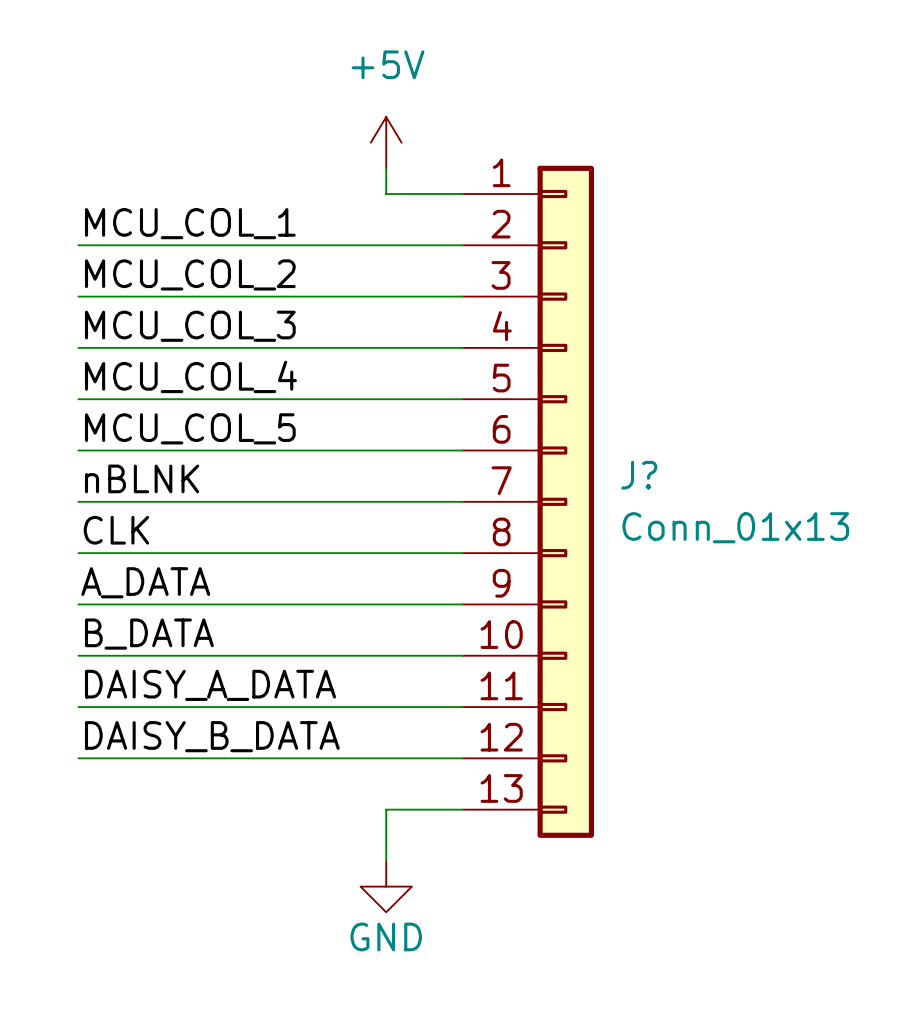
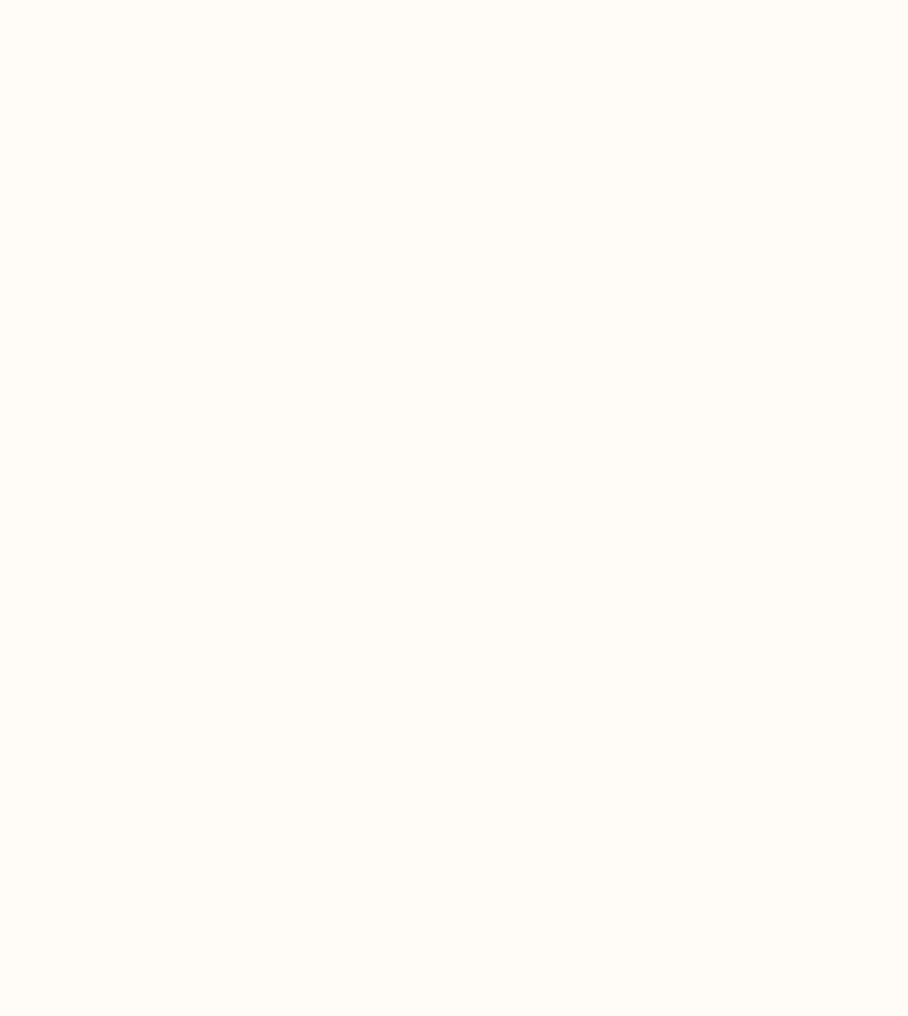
power symbol: +5V (386, 142) -> none
wire: (386, 168) (386, 193) (463, 193) -> none
label: MCU_COL_1 (190, 223) -> none
wire: (78, 245) (463, 245) -> none
label: MCU_COL_2 (190, 274) -> none
wire: (78, 296) (463, 296) -> none
label: MCU_COL_3 (190, 326) -> none
wire: (78, 347) (463, 347) -> none
label: MCU_COL_4 (190, 376) -> none
wire: (78, 399) (463, 399) -> none
label: MCU_COL_5 (190, 428) -> none
wire: (78, 450) (463, 450) -> none
label: nBLNK (142, 478) -> none
wire: (78, 501) (463, 501) -> none
J?: Conn_01x13 (528, 501) -> none
label: CLK (116, 530) -> none
wire: (78, 553) (463, 553) -> none
label: A_DATA (145, 582) -> none
wire: (78, 604) (463, 604) -> none
label: B_DATA (149, 634) -> none
wire: (78, 655) (463, 655) -> none
label: DAISY_A_DATA (210, 685) -> none
wire: (78, 707) (463, 707) -> none
label: DAISY_B_DATA (212, 736) -> none
wire: (78, 758) (463, 758) -> none
wire: (463, 809) (386, 809) (386, 860) -> none
power symbol: GND (386, 886) -> none

